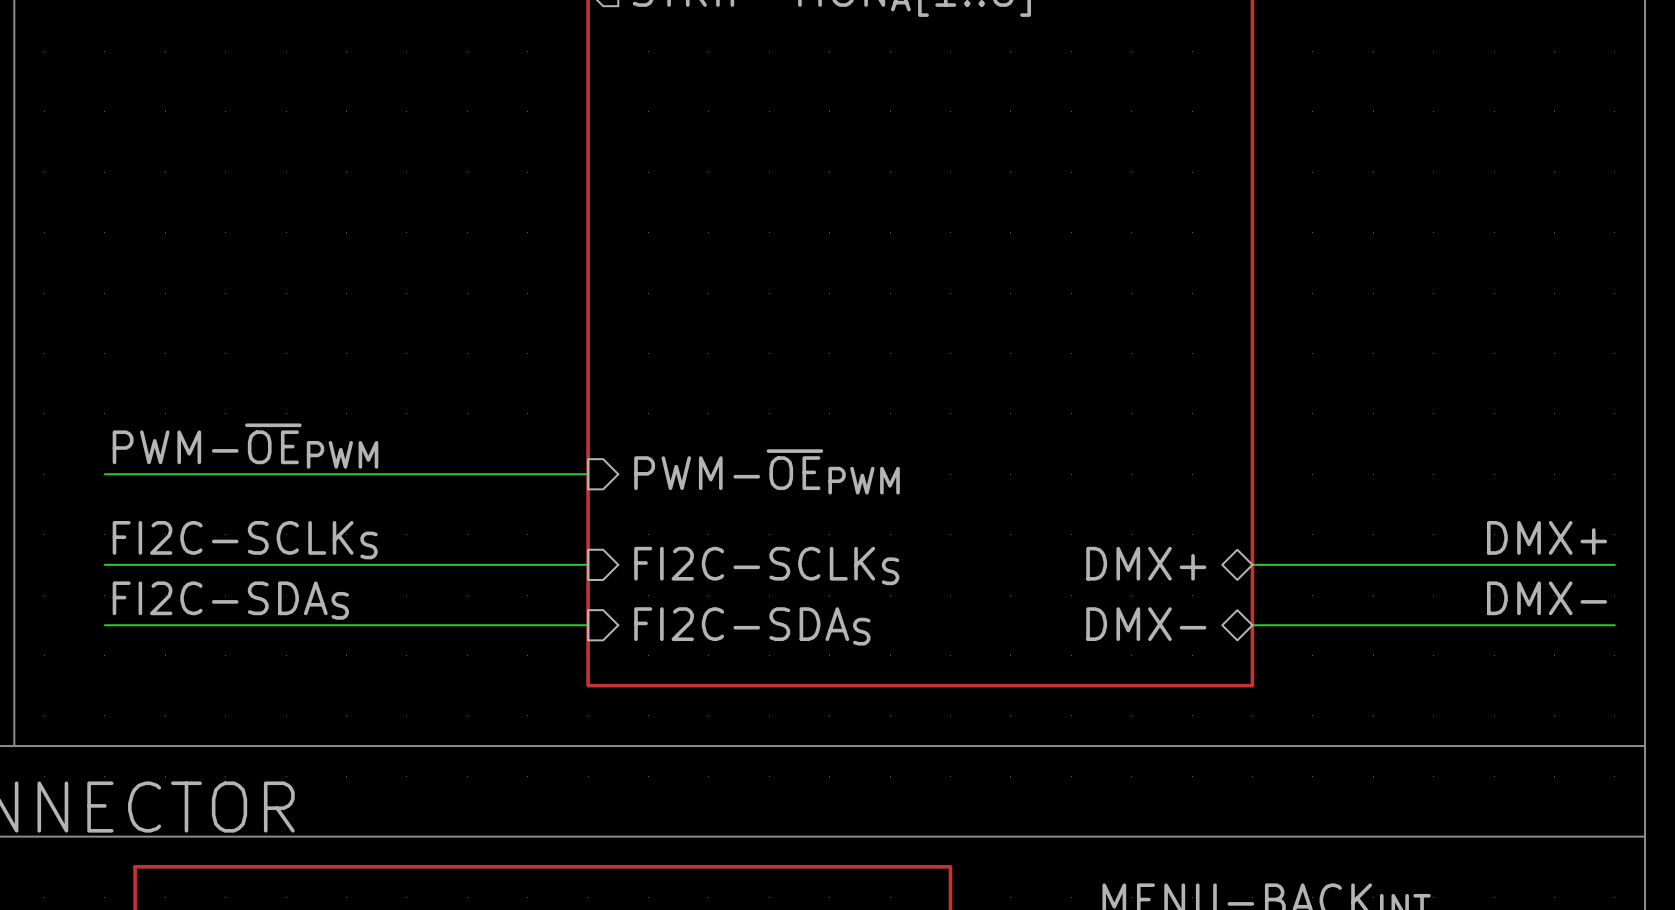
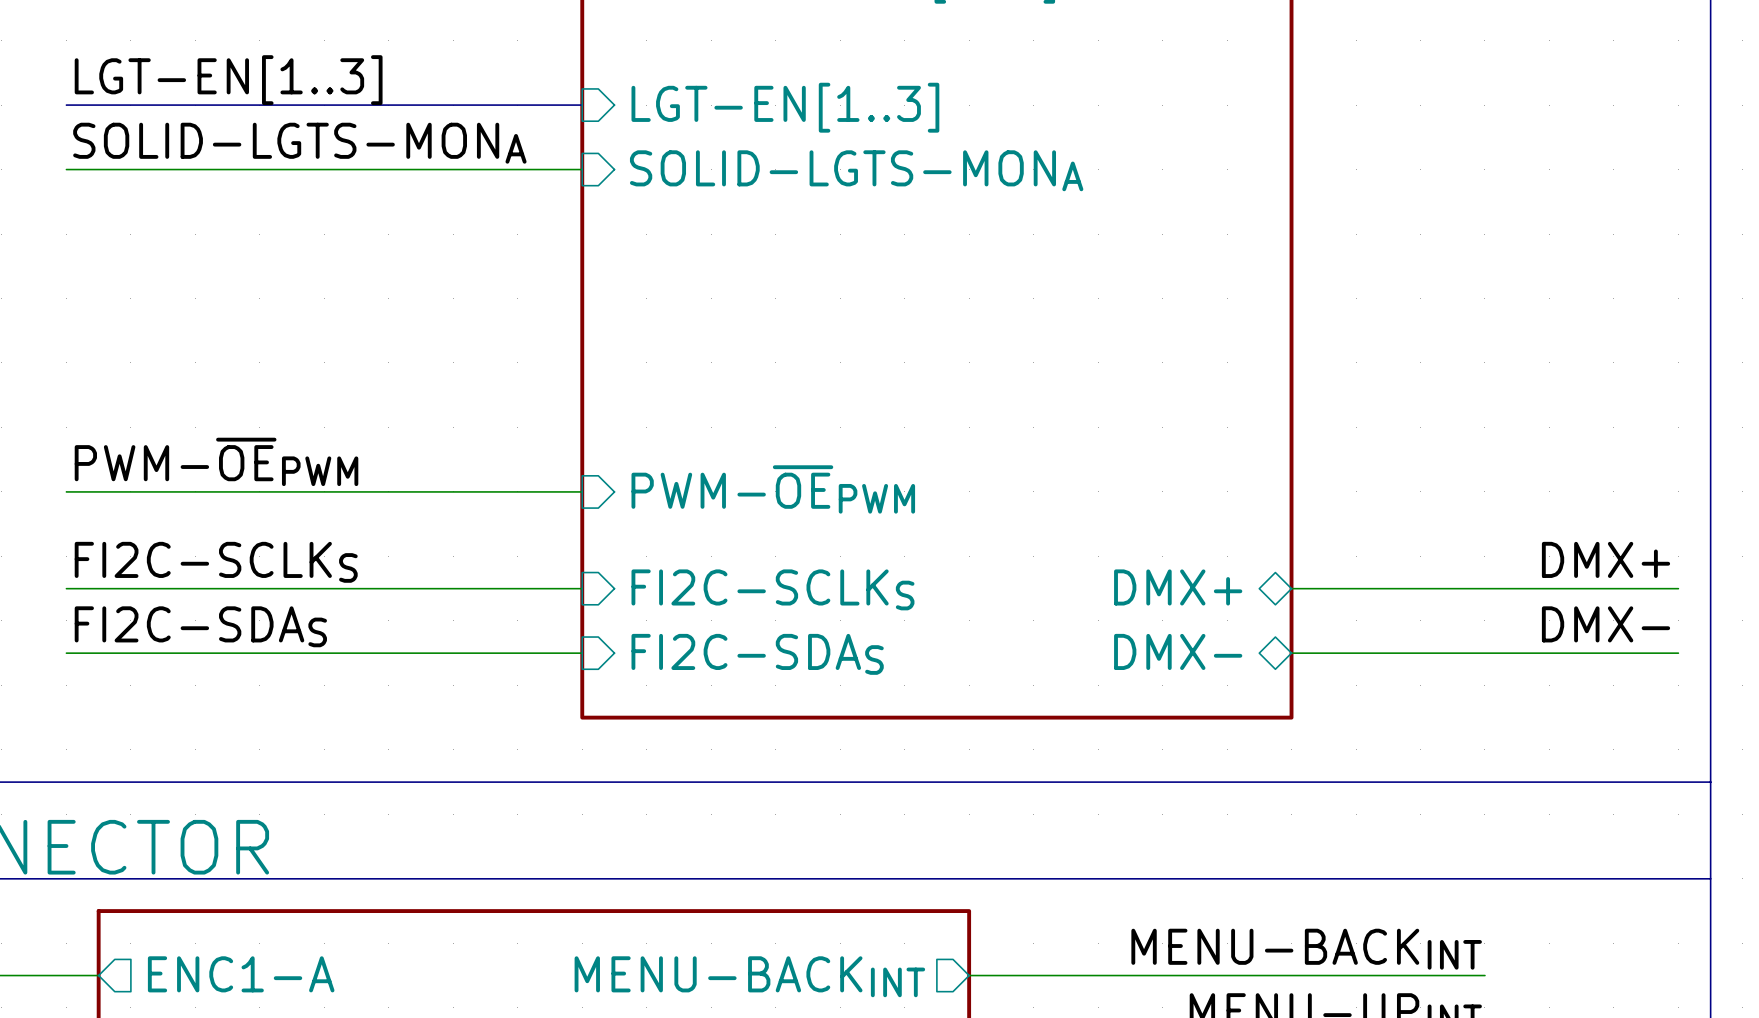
label: none -> LGT-EN[1..3] (228, 80)
bus: none -> (66, 105) (582, 105)
sheet pin: none -> LGT-EN[1..3] (785, 107)
label: none -> SOLID-LGTS-MONA (299, 143)
wire: none -> (66, 169) (582, 169)
sheet pin: none -> SOLID-LGTS-MONA (856, 170)

